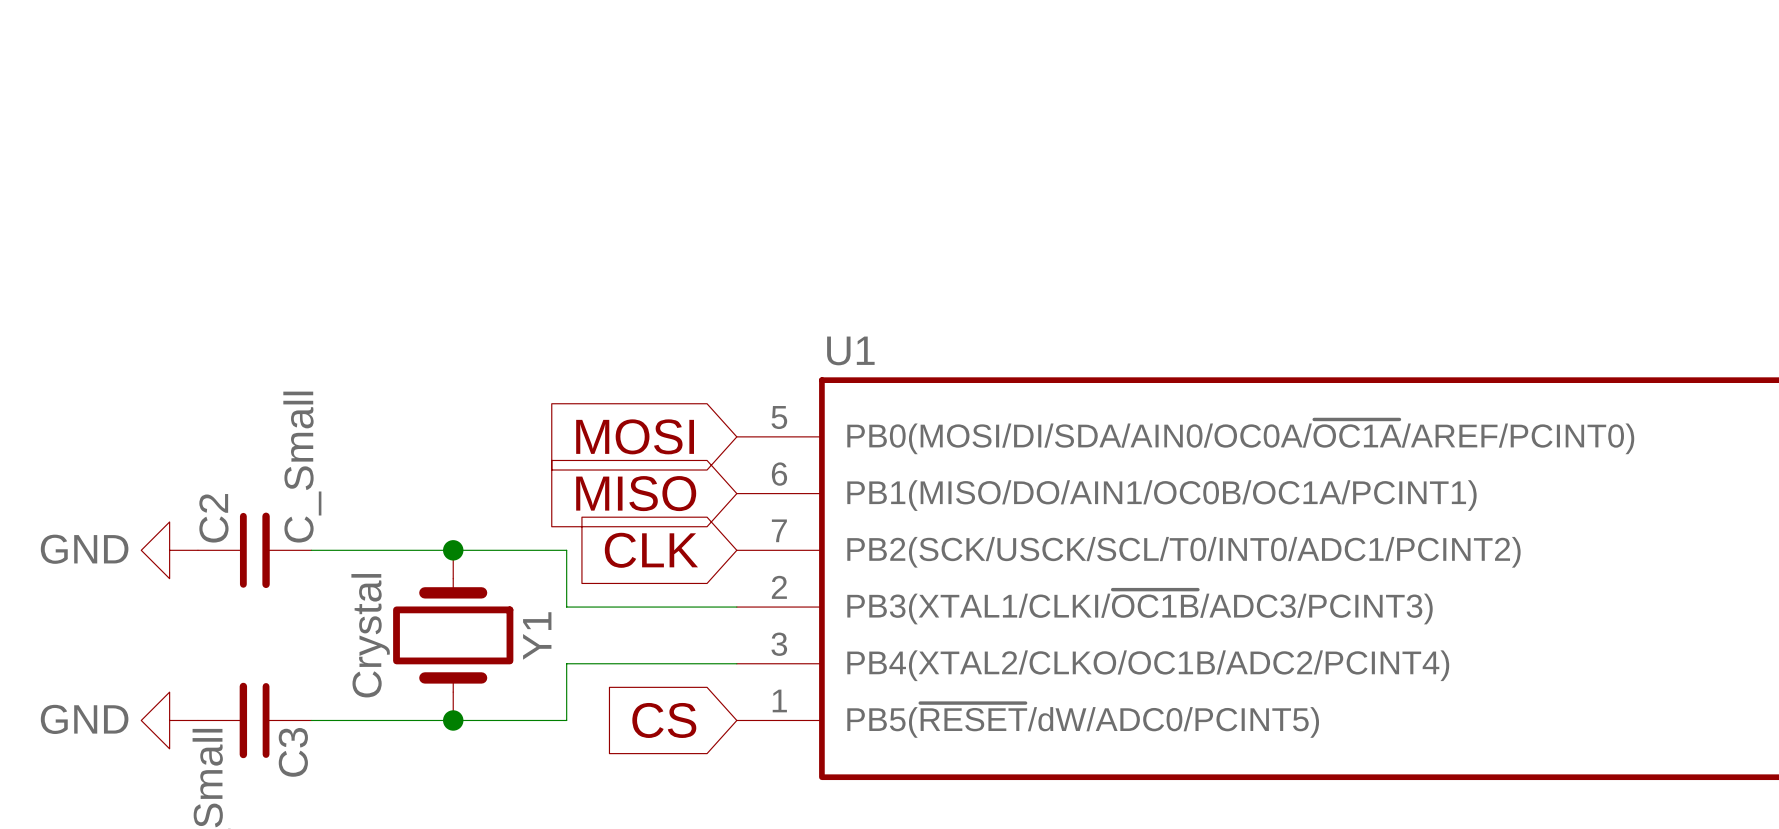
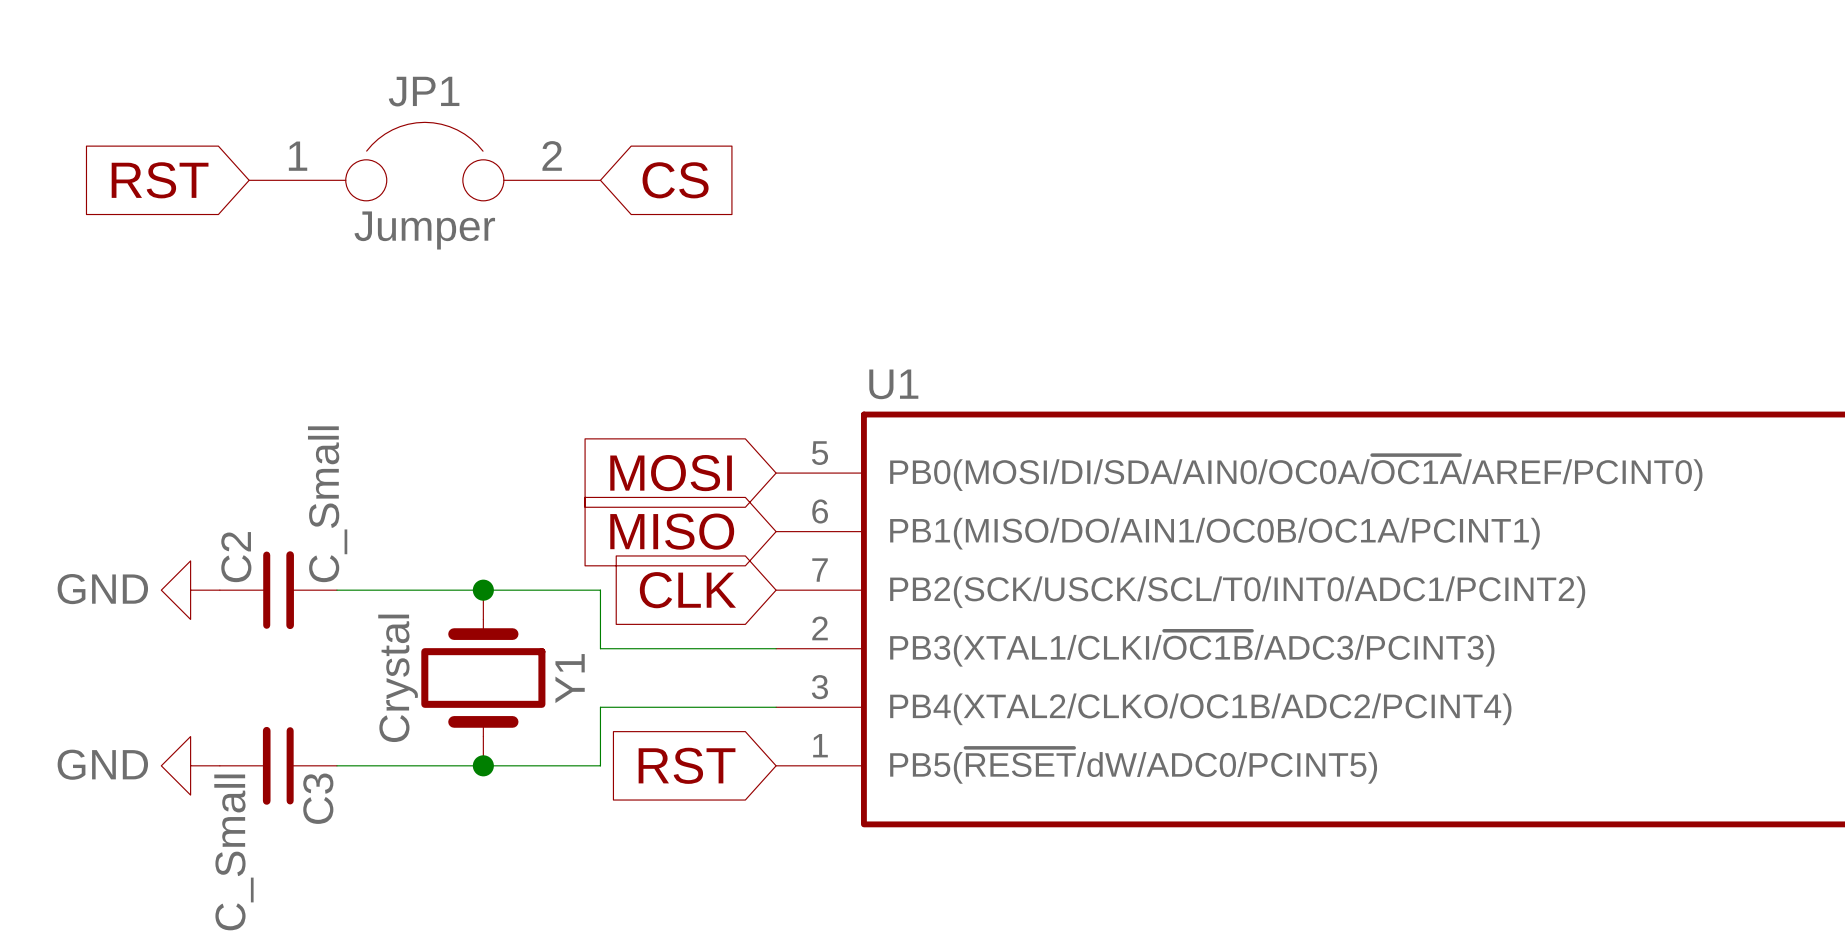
JP1: none -> Jumper (424, 161)
global label: none -> RST (160, 180)
global label: none -> CS (675, 180)
global label: CS (664, 720) -> RST (687, 765)

